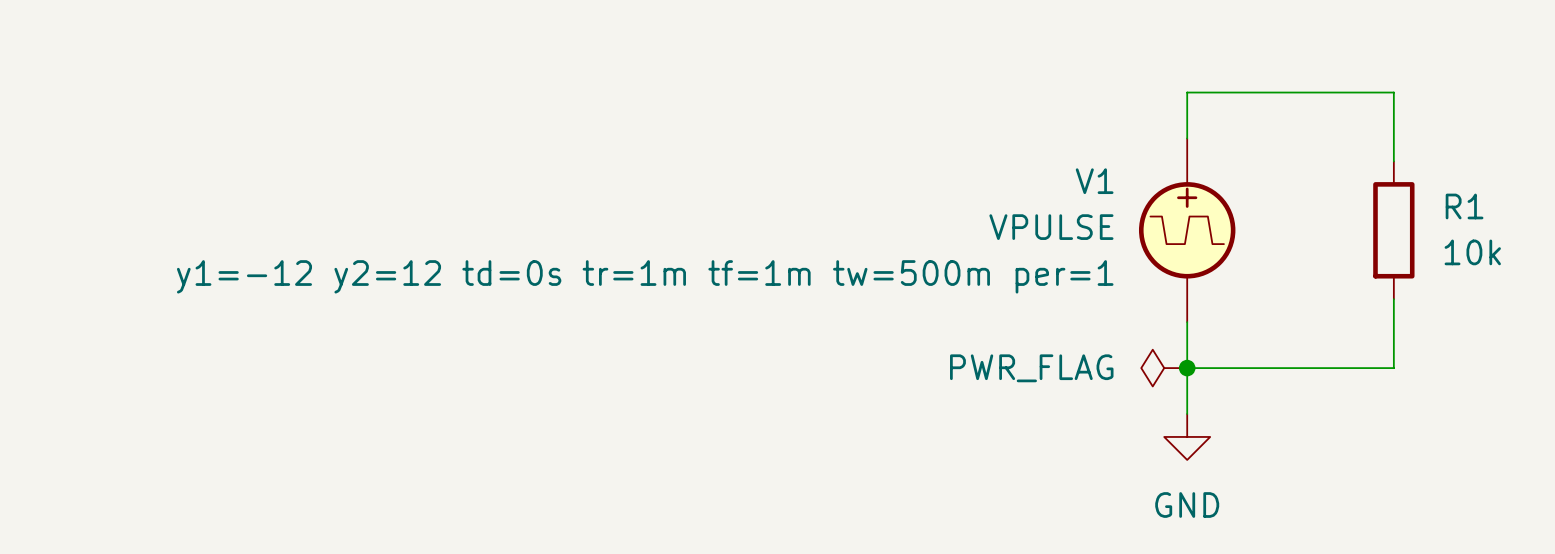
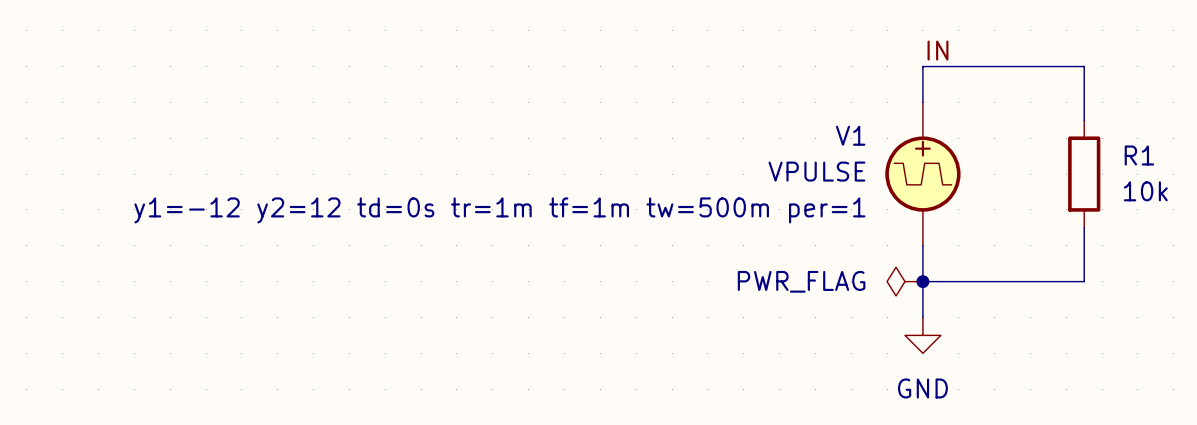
label: none -> IN (937, 50)

